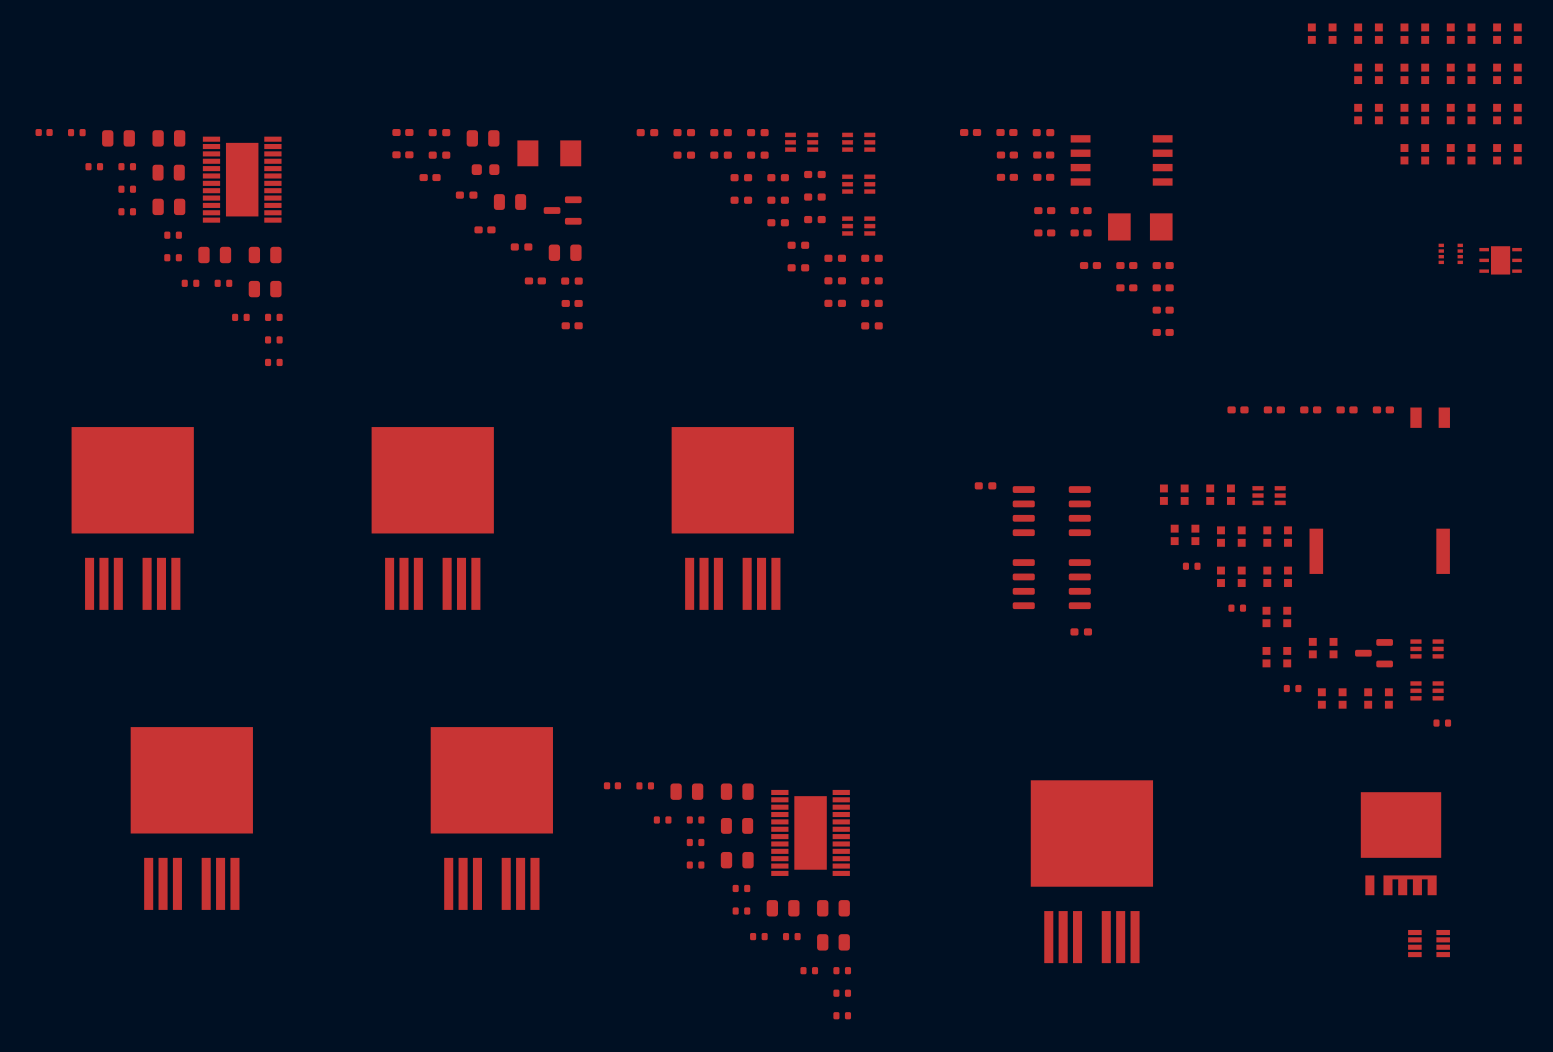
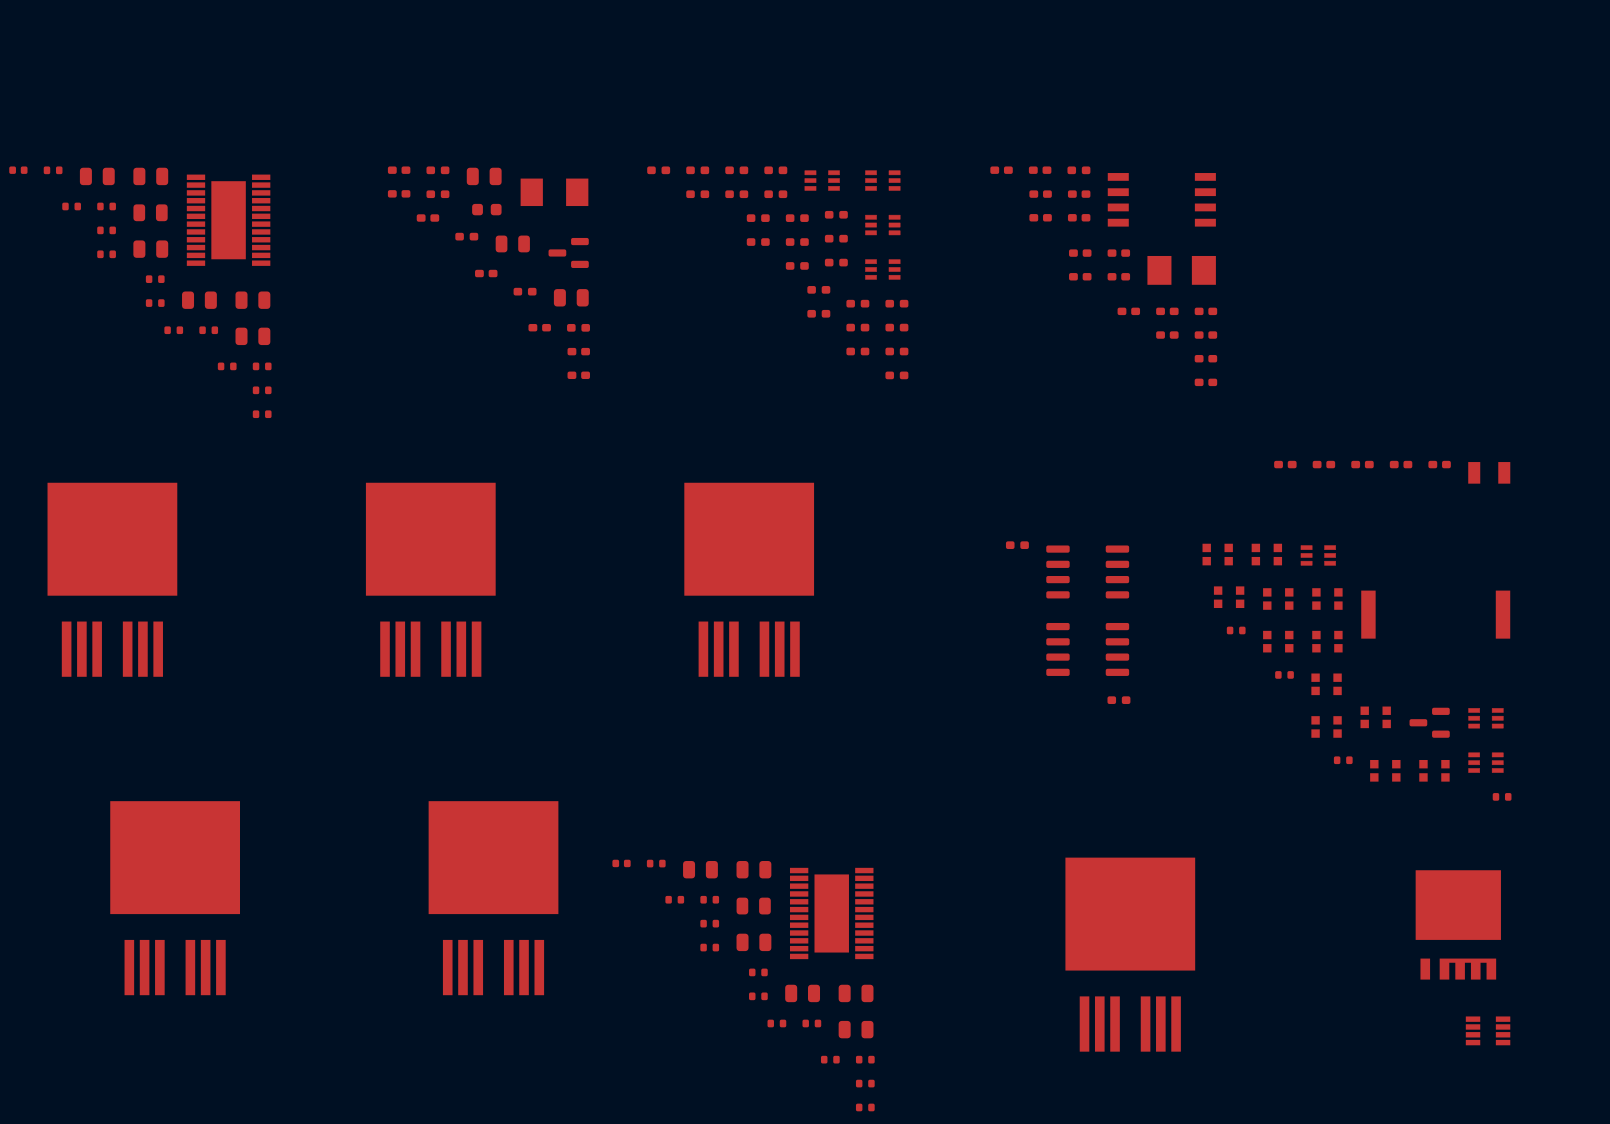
part: (1322, 33) -> none
part: (1368, 33) -> none
part: (1414, 33) -> none
part: (1461, 33) -> none
part: (1507, 33) -> none
part: (1368, 73) -> none
part: (1414, 73) -> none
part: (1461, 73) -> none
part: (1507, 73) -> none
part: (1368, 114) -> none
part: (1414, 114) -> none
part: (1461, 114) -> none
part: (1507, 114) -> none
part: (1414, 154) -> none
part: (1461, 154) -> none
part: (1507, 154) -> none
part: (1450, 253) -> none
part: (1500, 260) -> none

